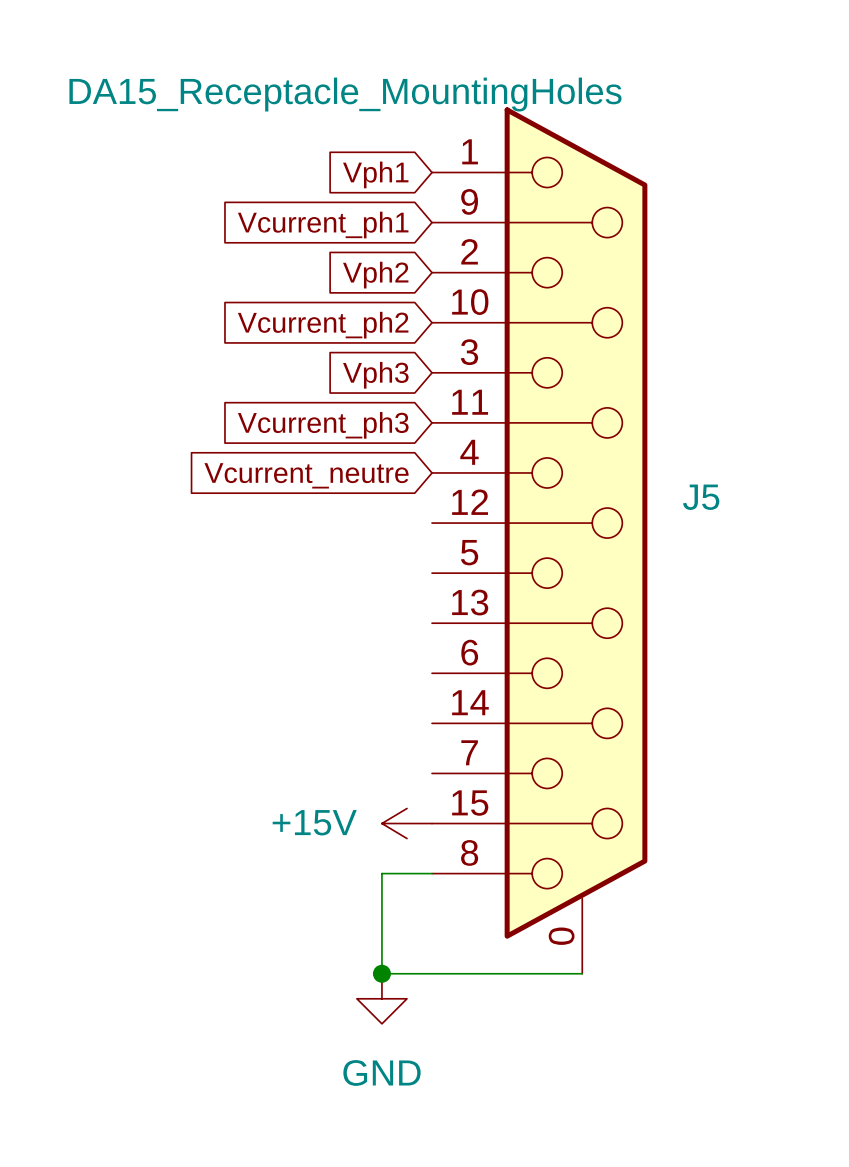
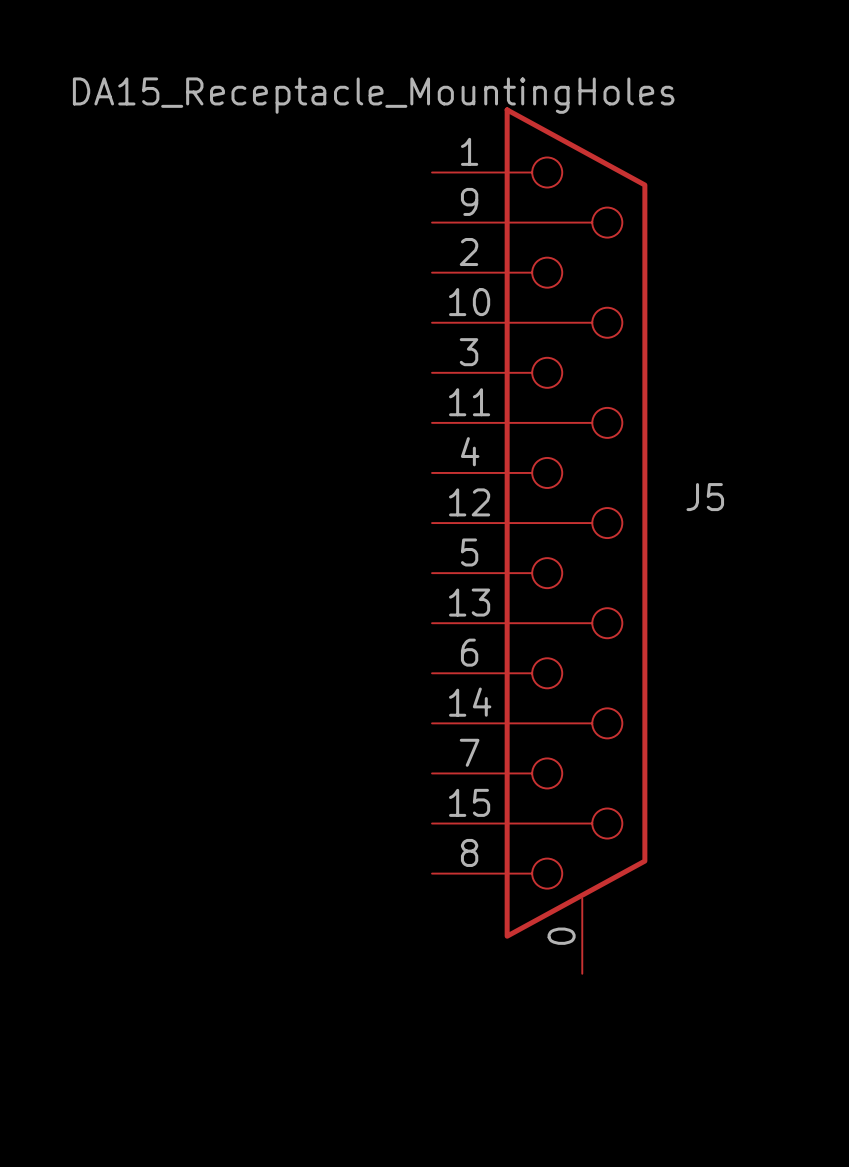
global label: Vph1 (375, 174) -> none
global label: Vcurrent_ph1 (323, 225) -> none
global label: Vph2 (375, 275) -> none
global label: Vcurrent_ph2 (323, 325) -> none
global label: Vph3 (375, 375) -> none
global label: Vcurrent_ph3 (323, 425) -> none
global label: Vcurrent_neutre (306, 475) -> none
power symbol: +15V (406, 823) -> none
wire: (432, 873) (381, 873) (381, 973) (582, 973) -> none
junction: (381, 973) -> none
power symbol: GND (381, 998) -> none

